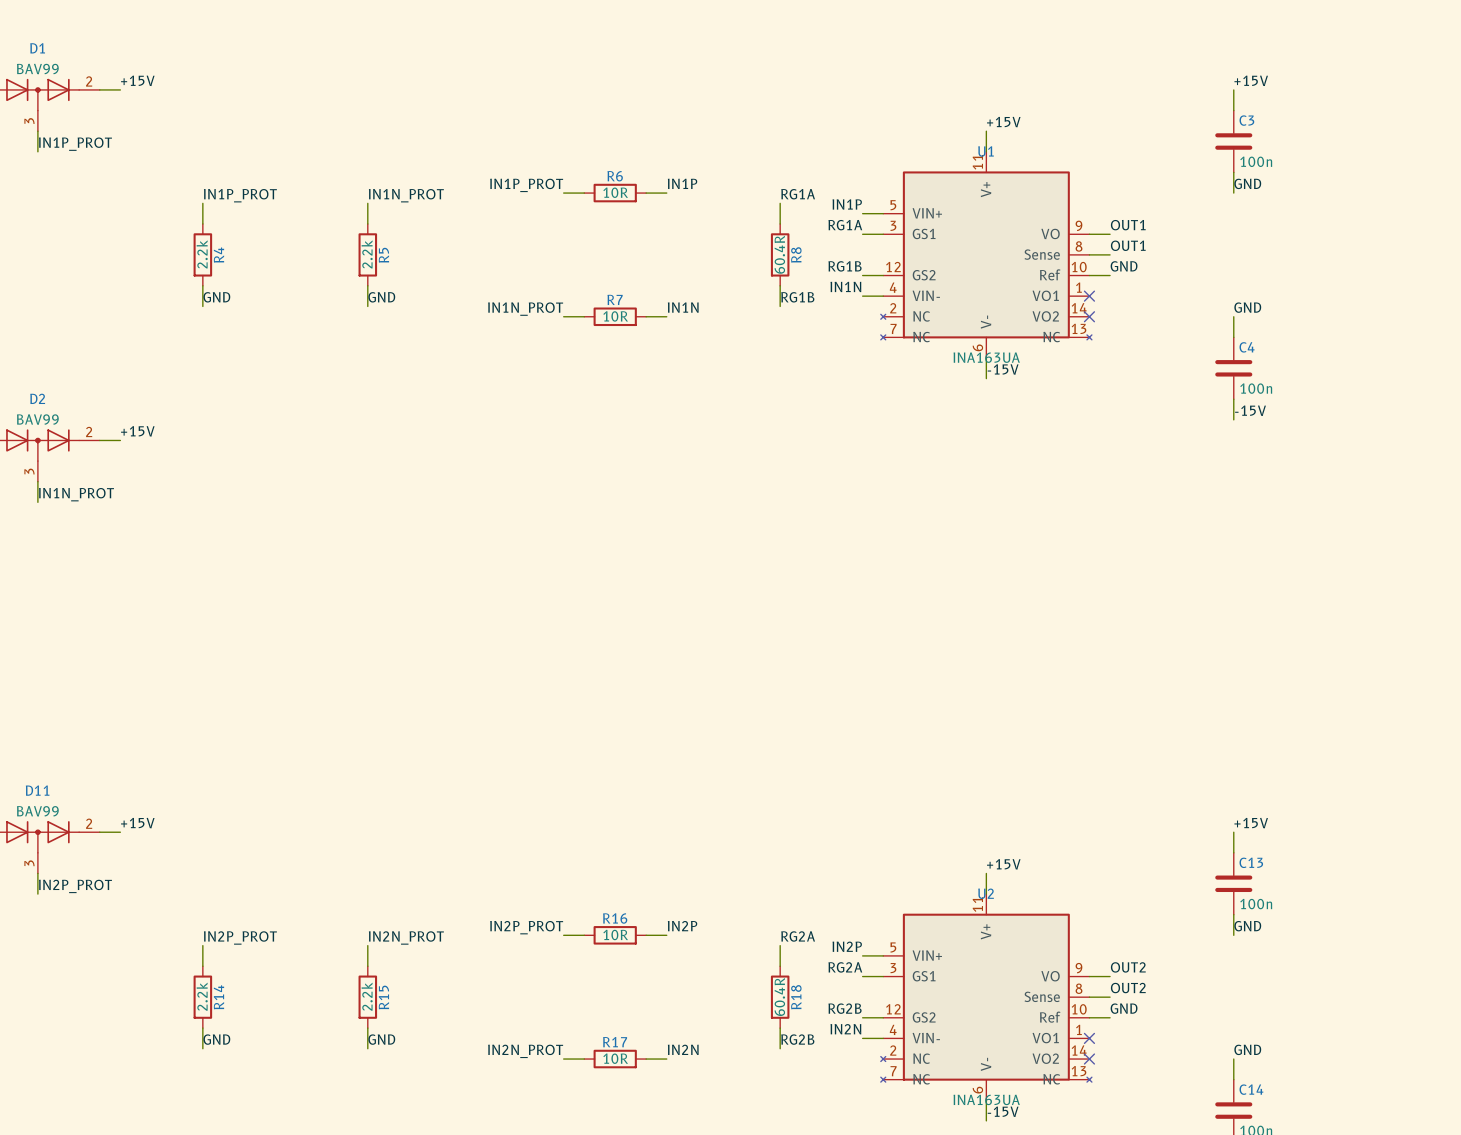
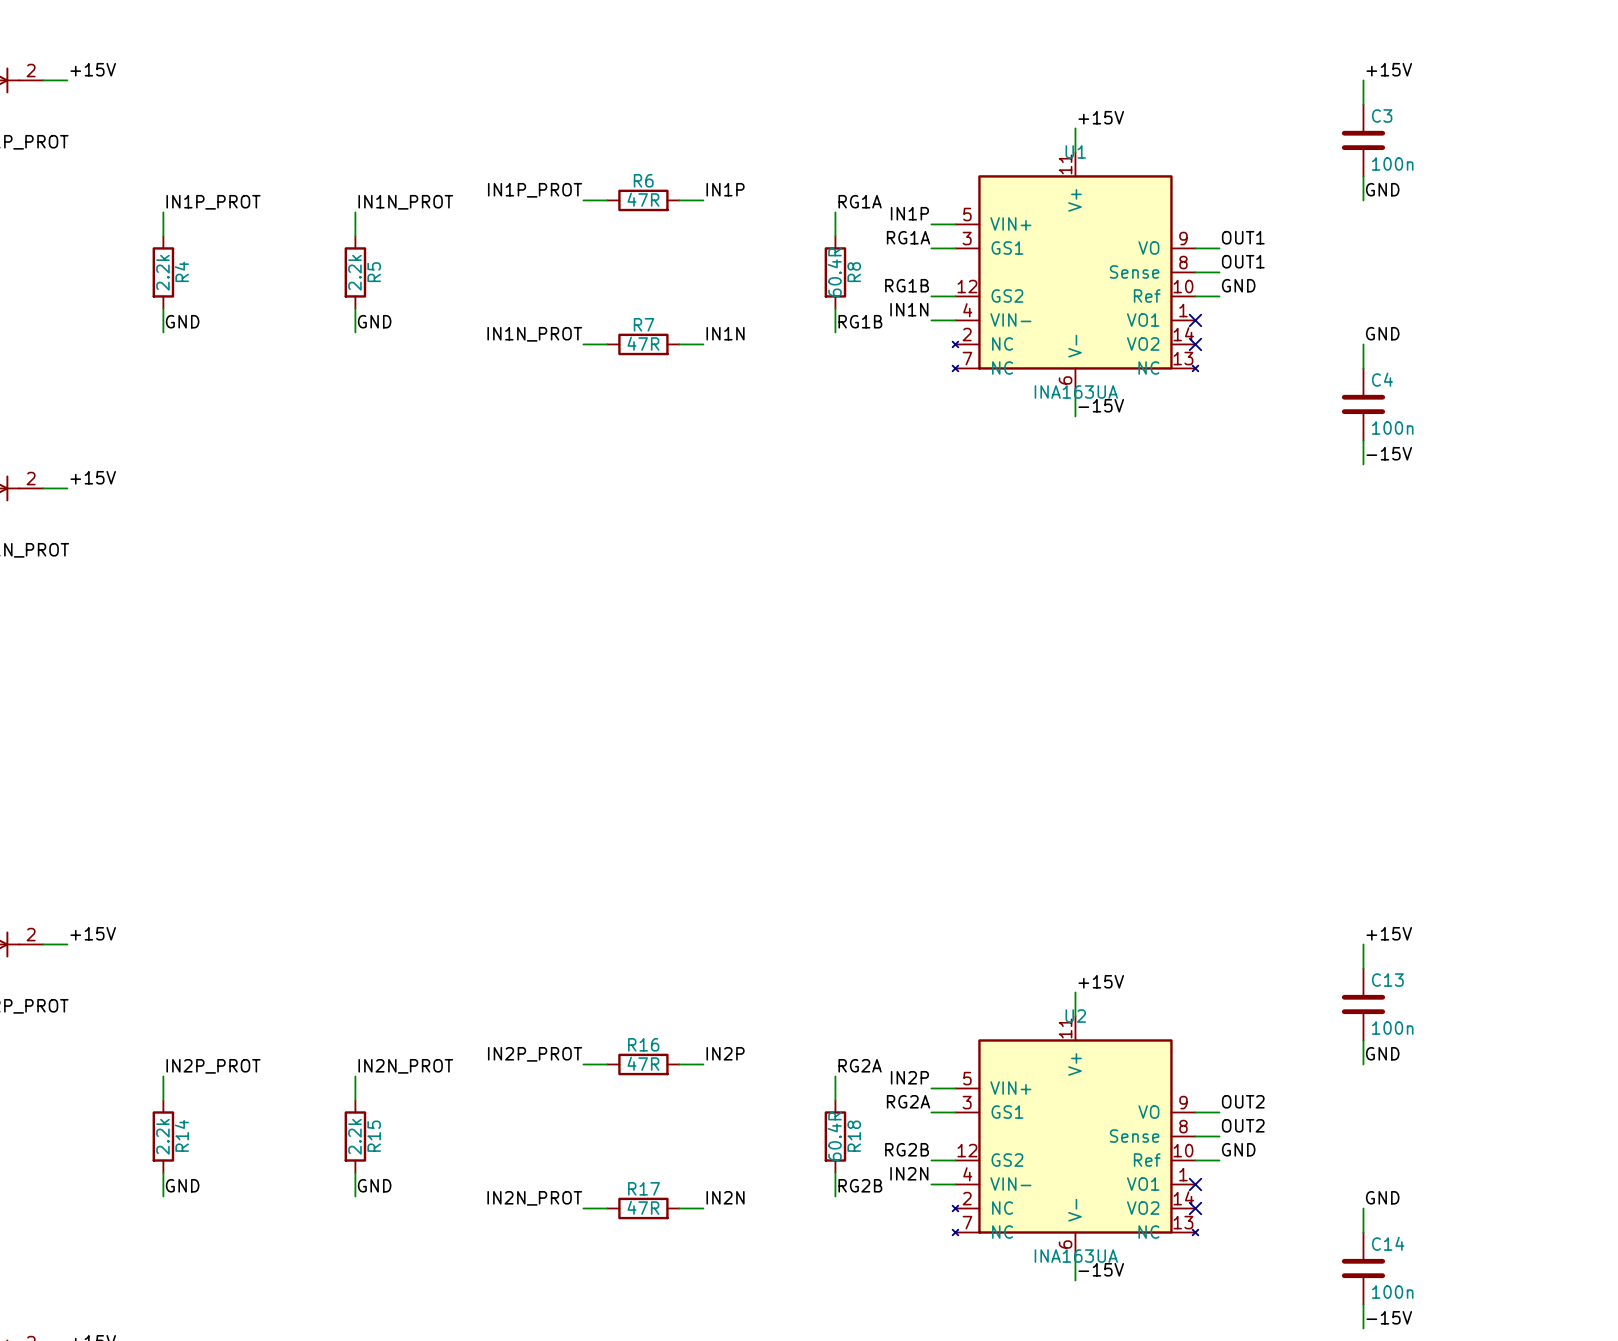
R6 value: 10R (615, 192) -> 47R (643, 199)
R7 value: 10R (615, 316) -> 47R (643, 343)
R16 value: 10R (615, 934) -> 47R (643, 1063)
R17 value: 10R (615, 1058) -> 47R (643, 1207)

